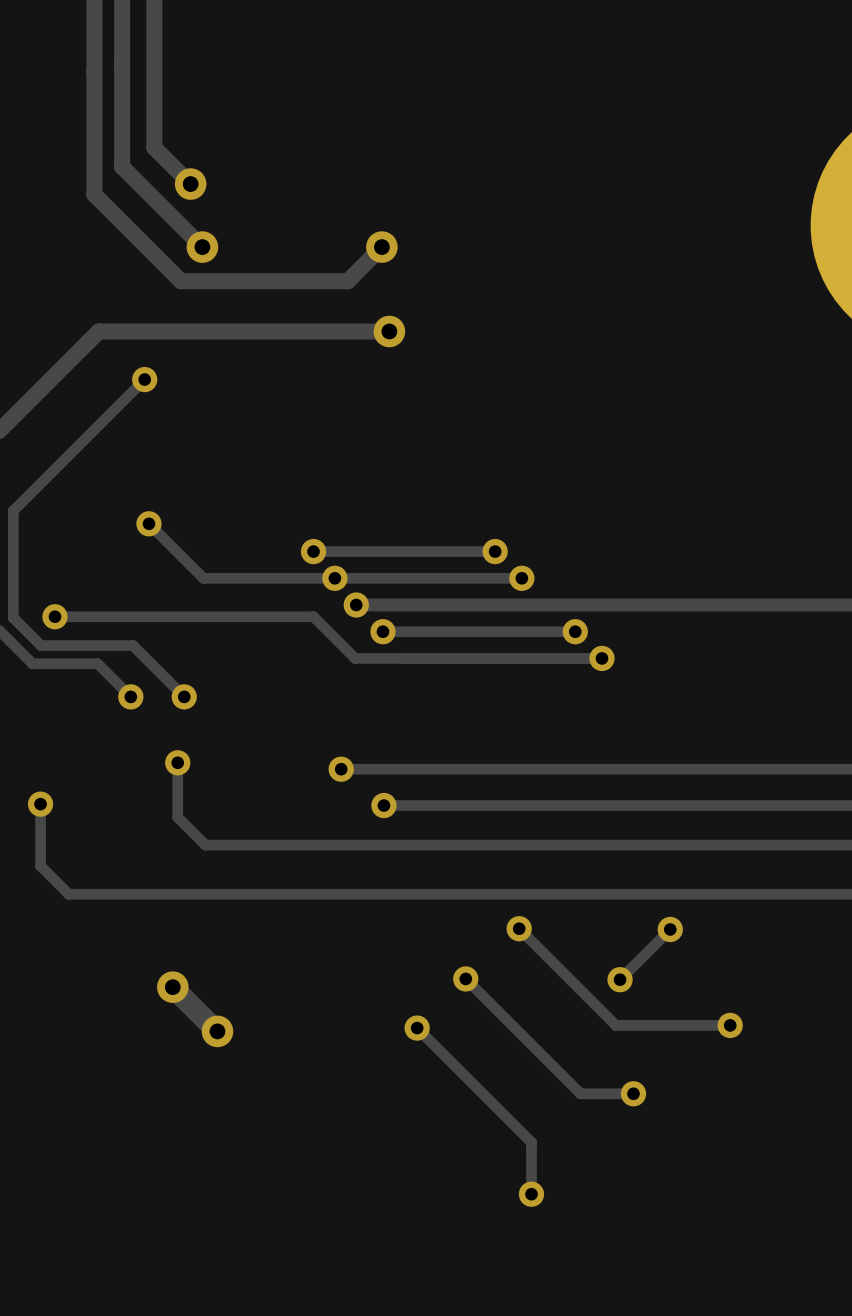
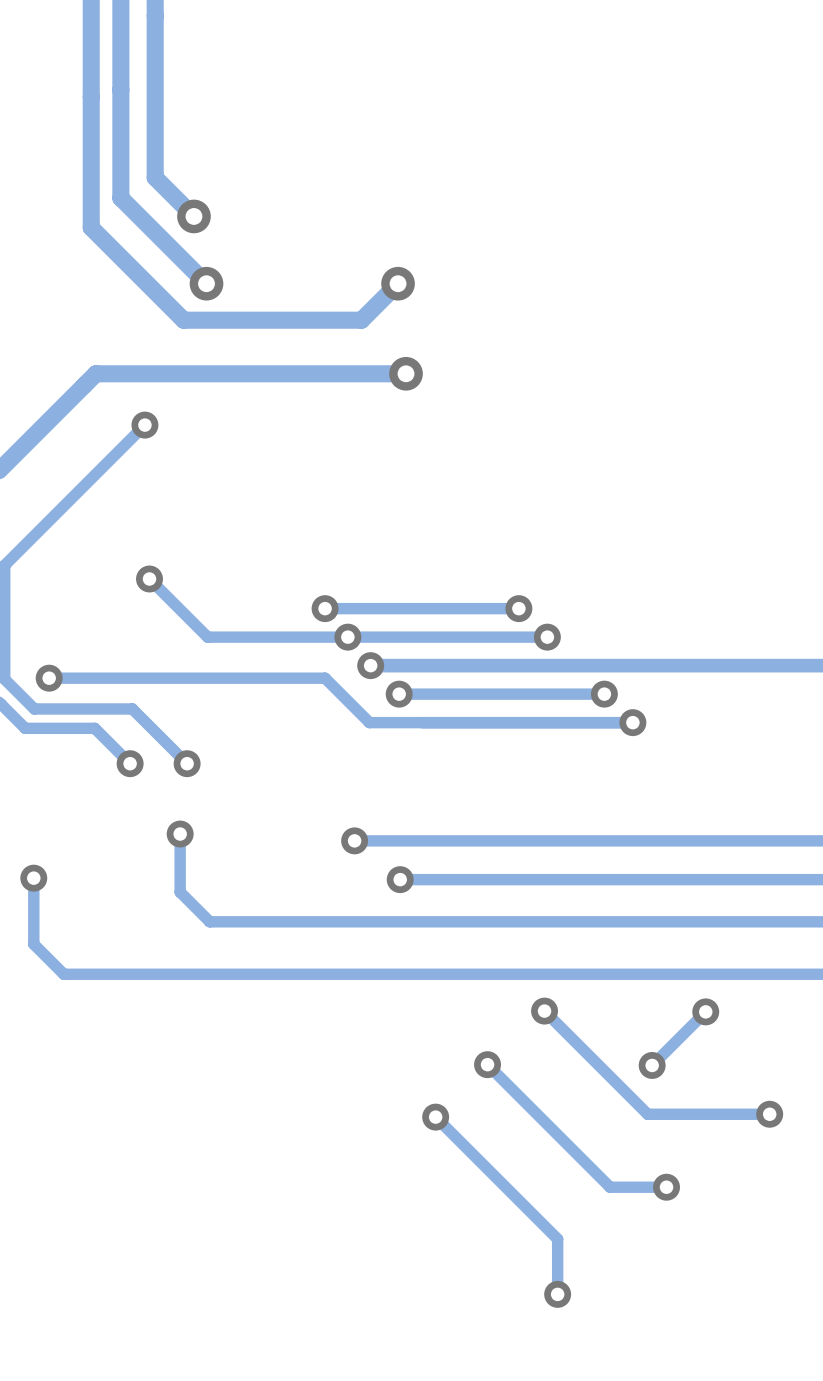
track: (172, 987) (217, 1031) -> none
via: (172, 987) -> none
via: (217, 1031) -> none

